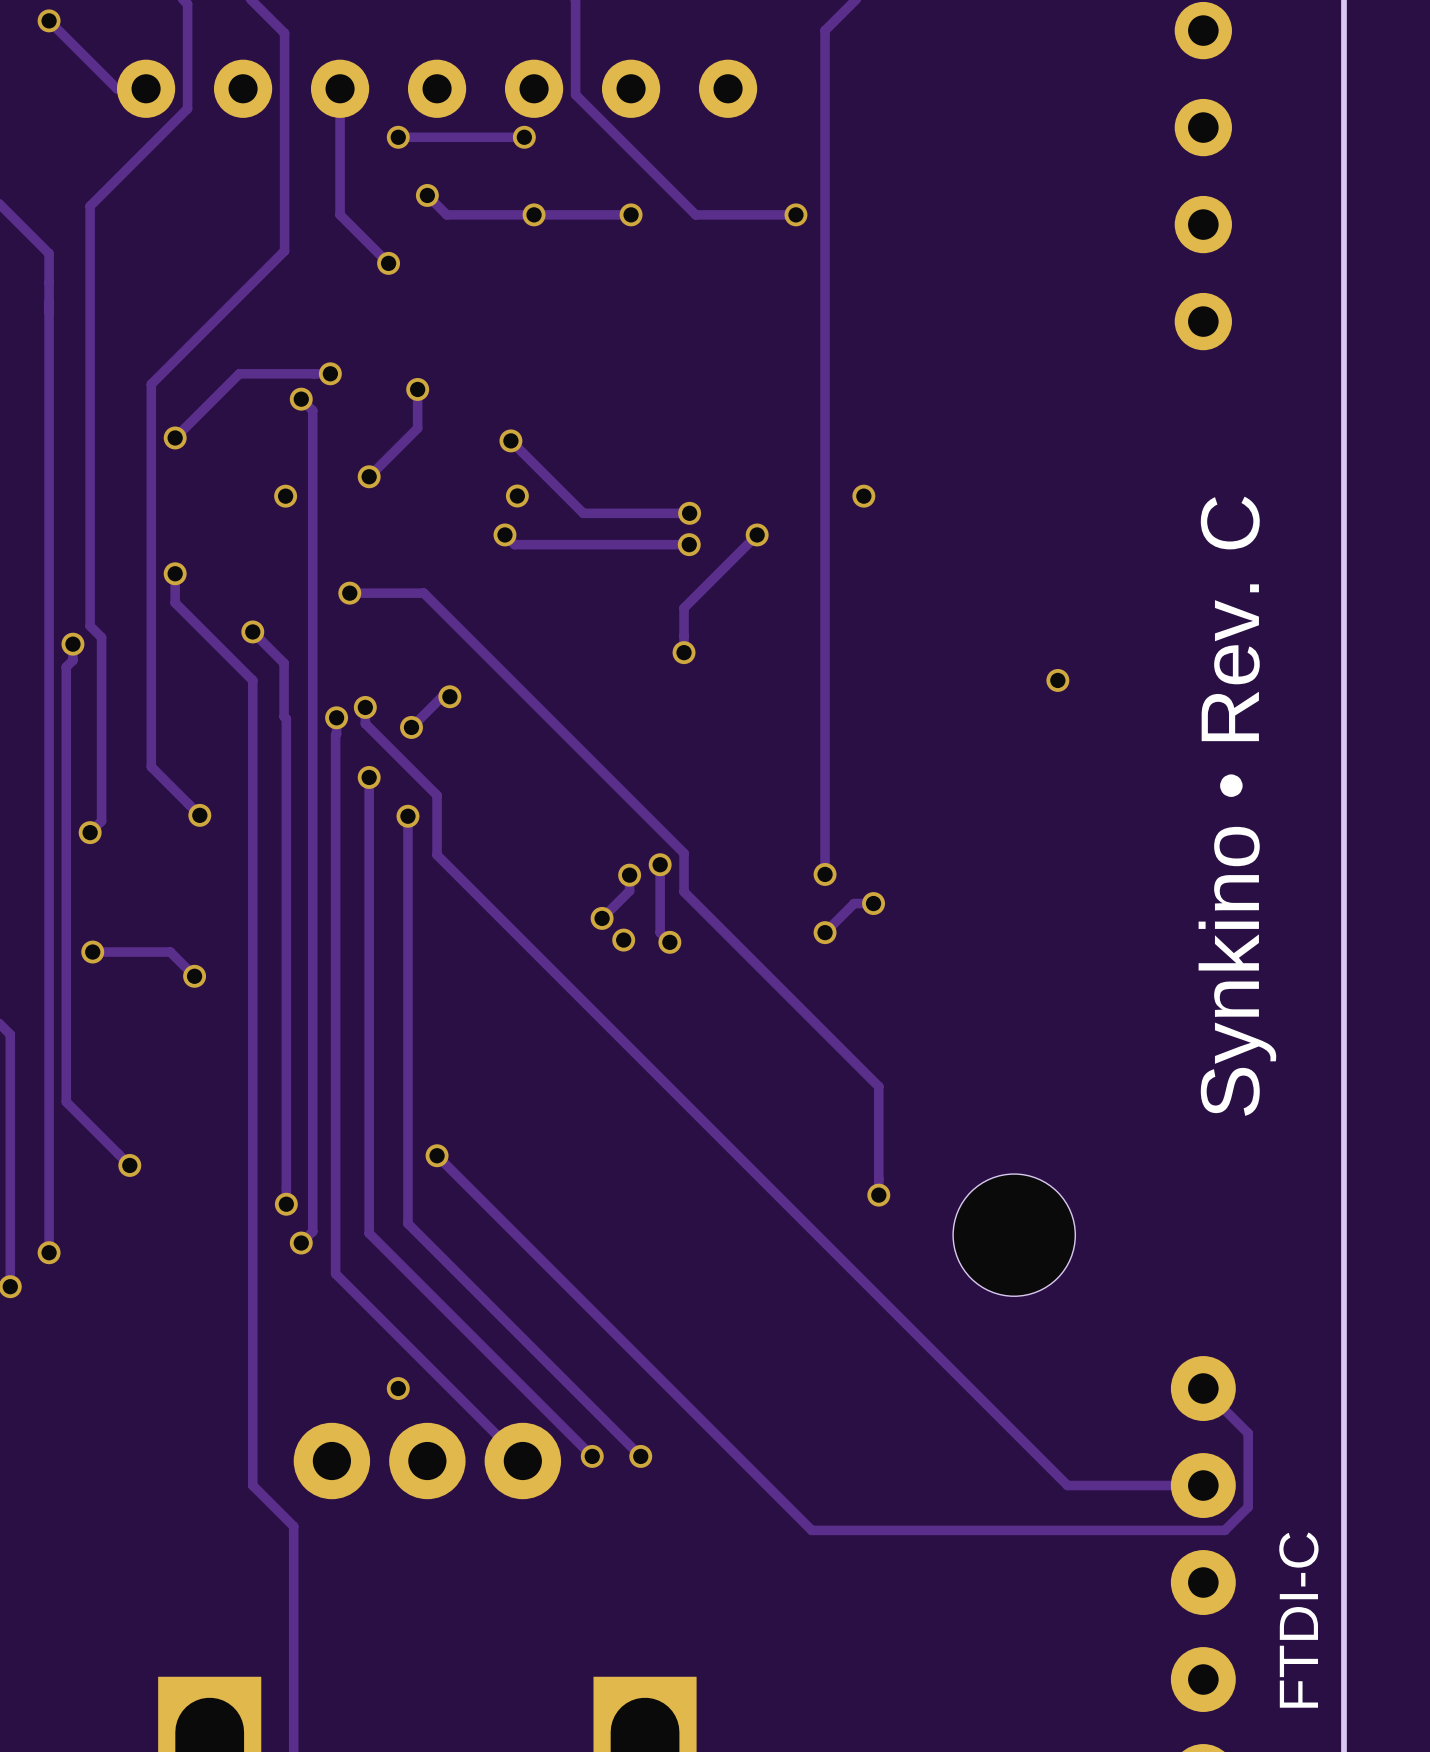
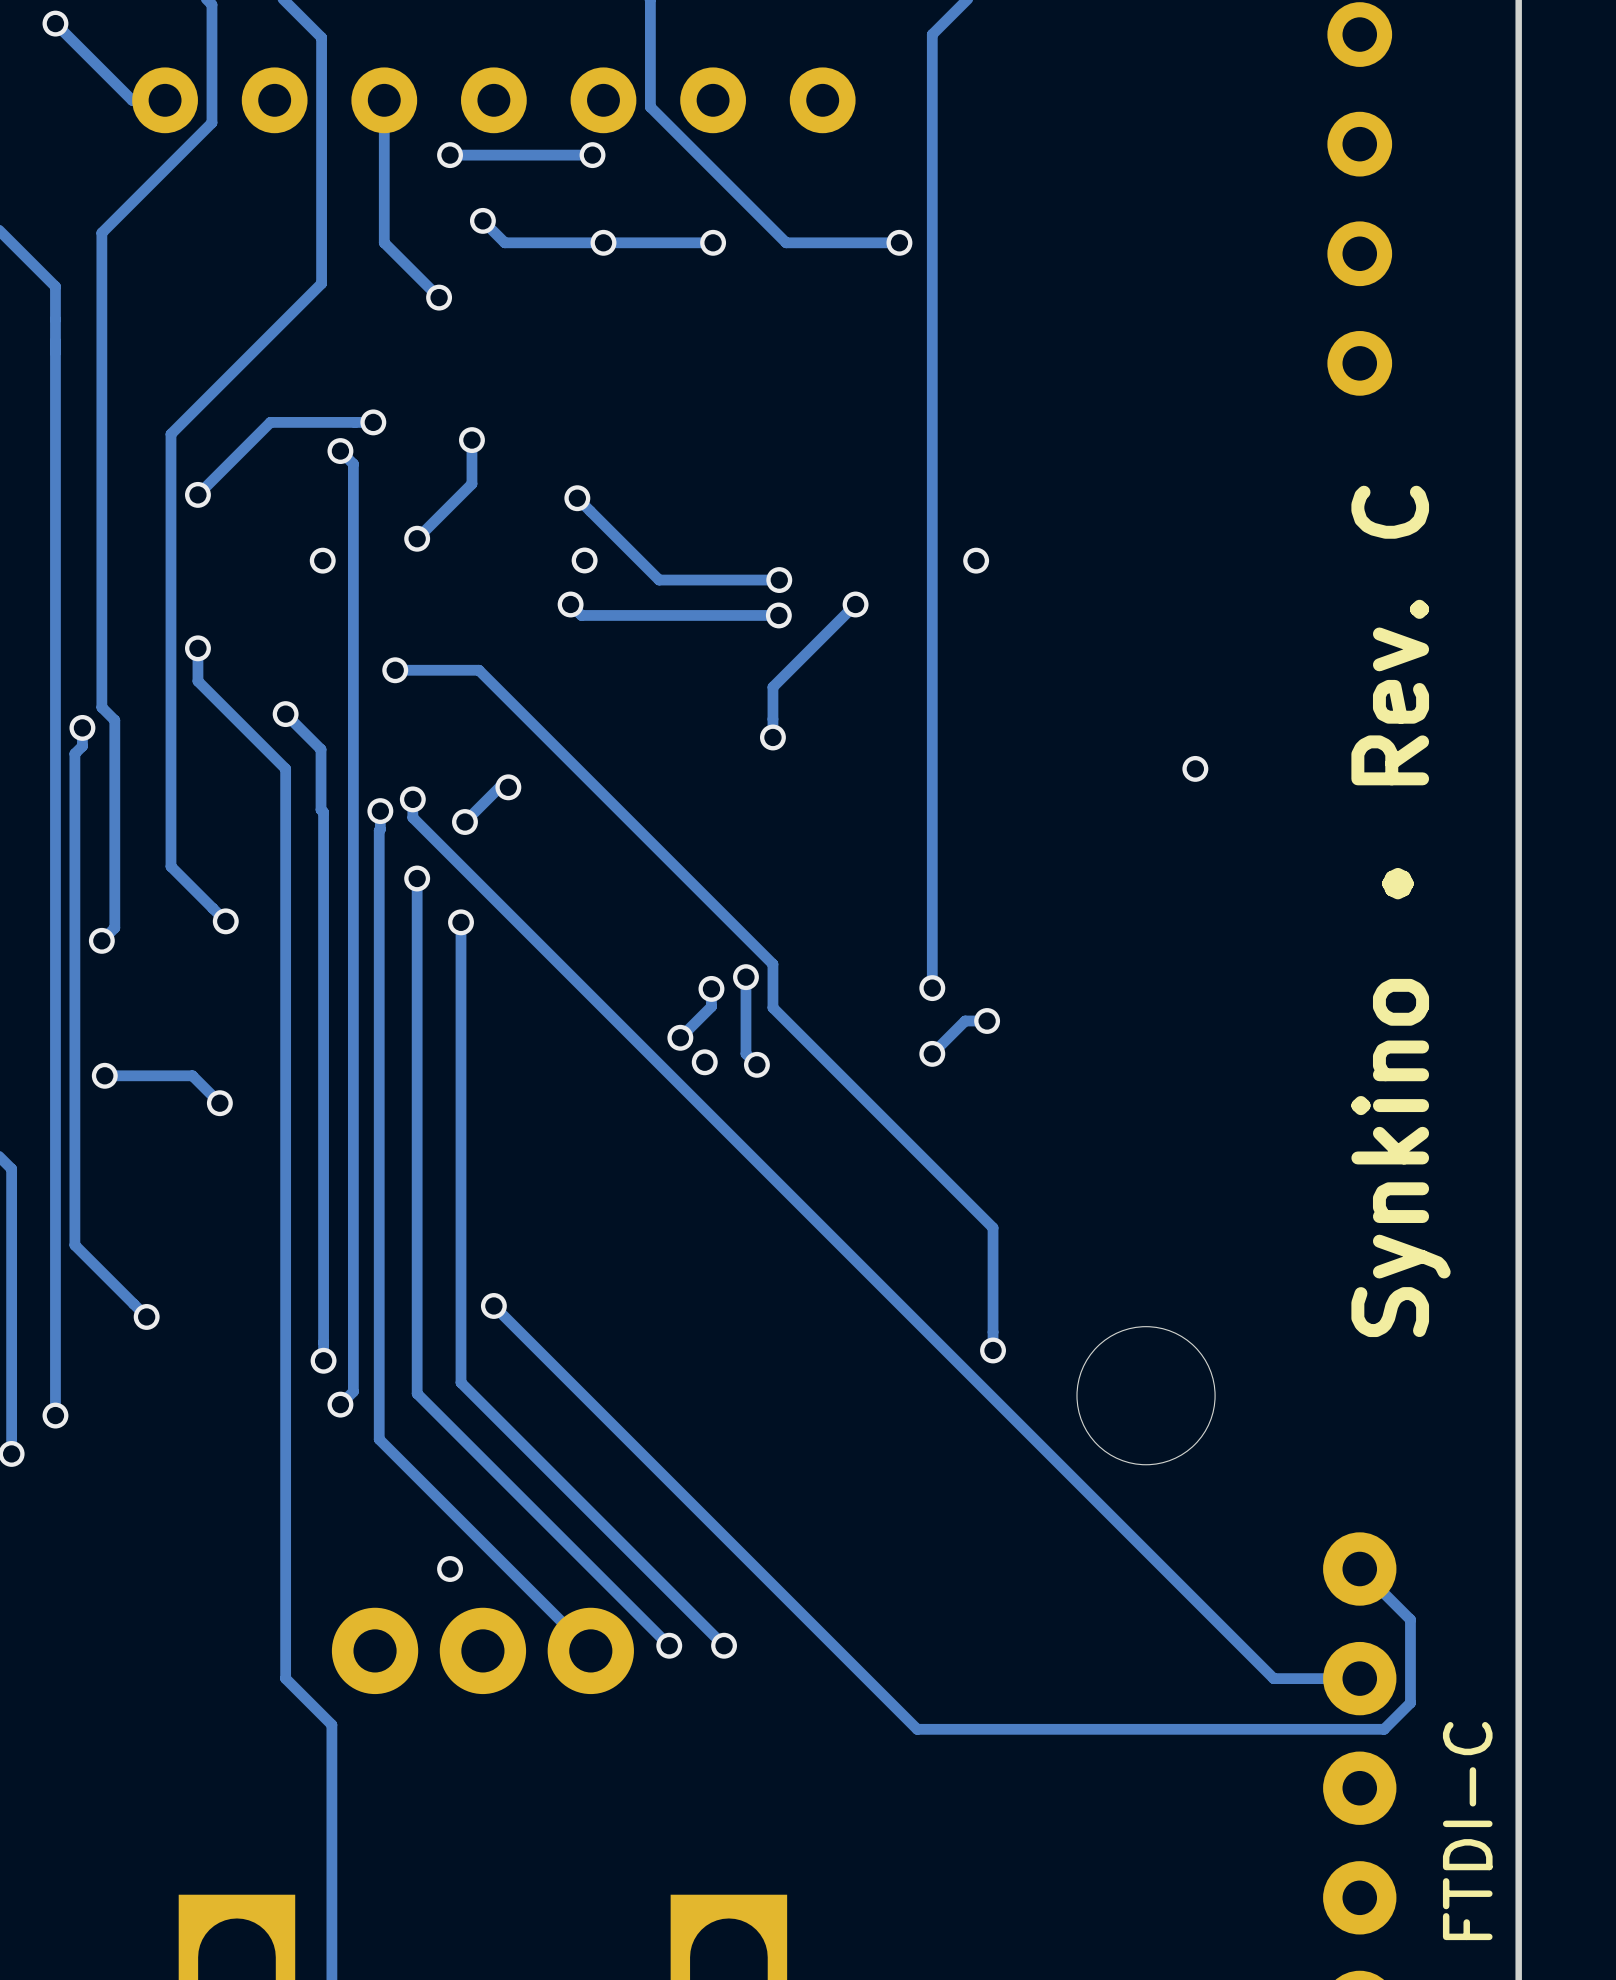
track: (437, 795) (437, 855) (1067, 1485) (1127, 1485) -> (493, 898) (1273, 1678)

